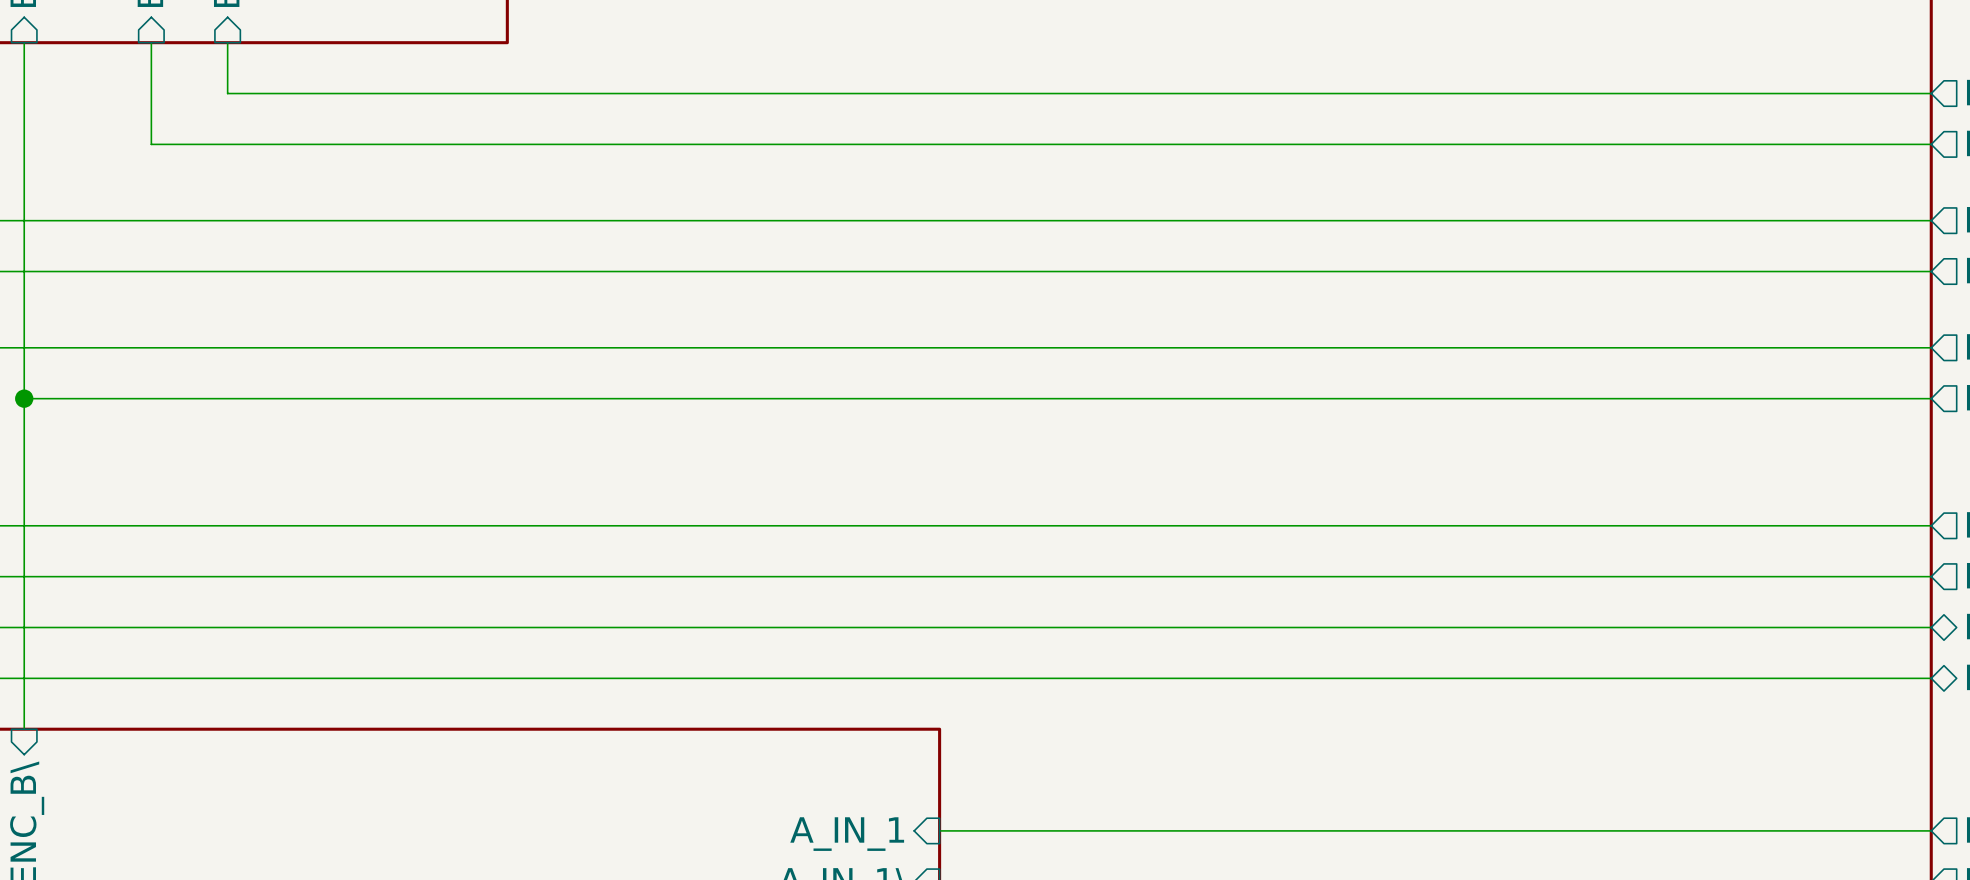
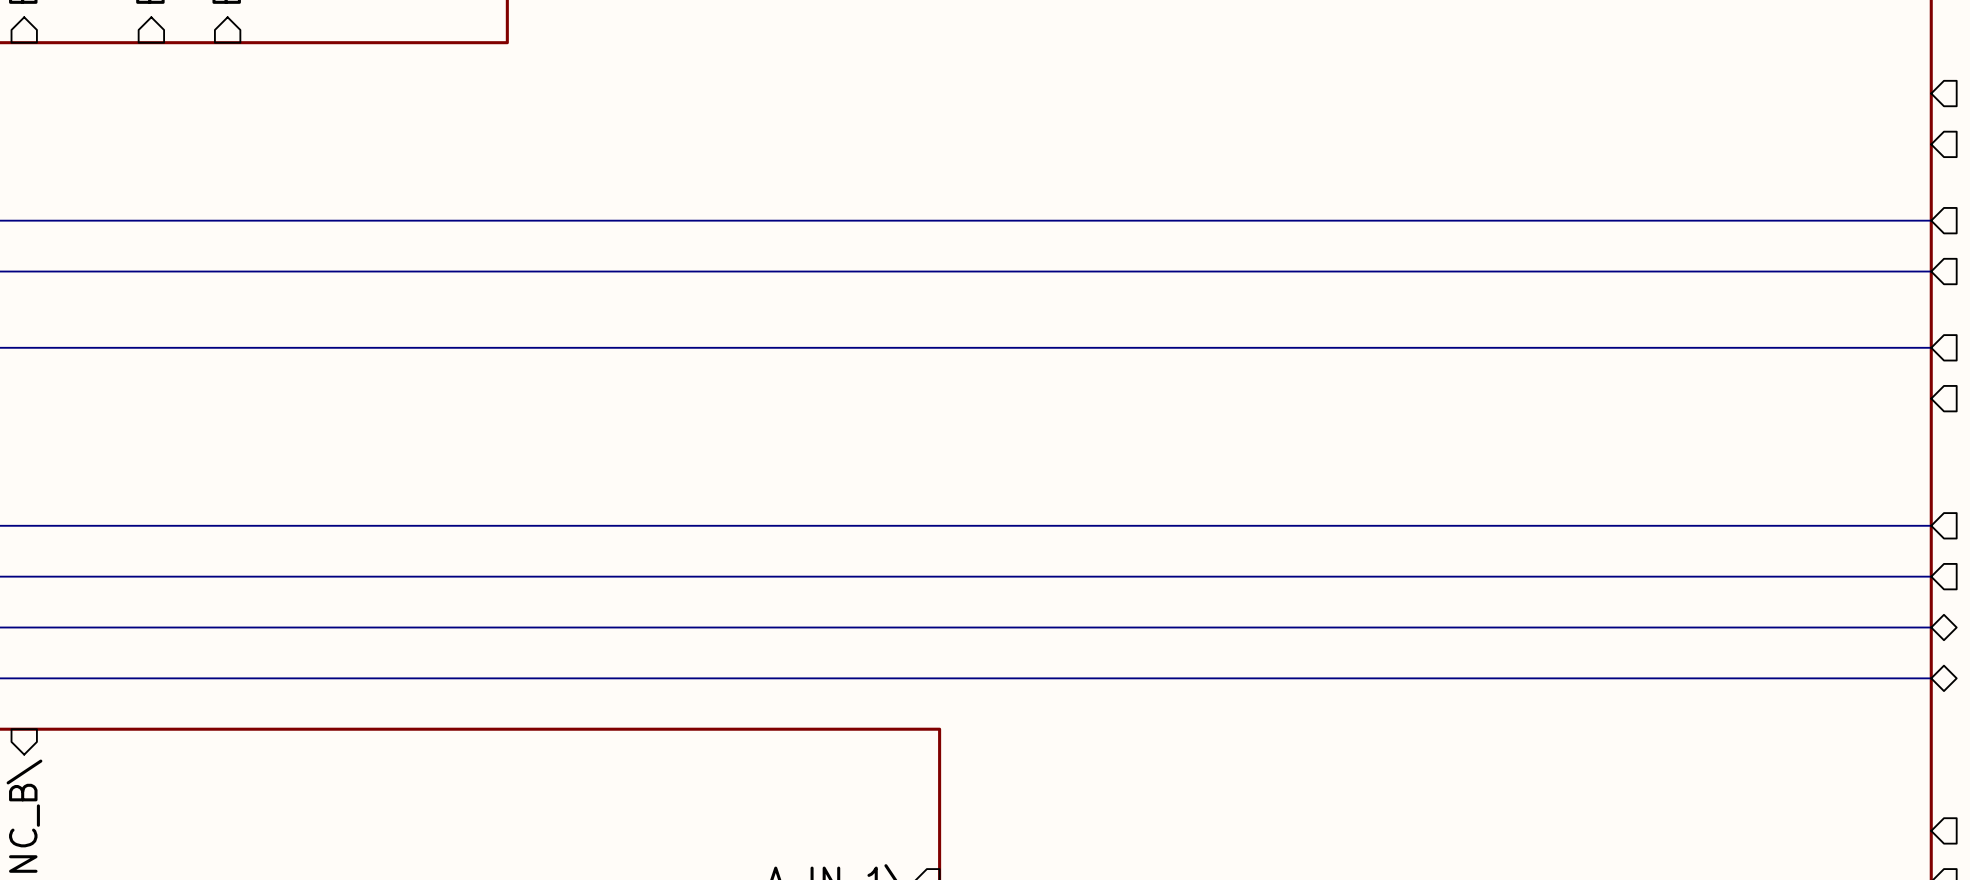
wire: (24, 42) (24, 729) -> none
wire: (151, 42) (151, 144) (1931, 144) -> none
wire: (227, 42) (227, 93) (1931, 93) -> none
wire: (24, 398) (1931, 398) -> none
junction: (24, 398) -> none
wire: (939, 830) (1931, 830) -> none
sheet pin: A_IN_1 (847, 834) -> none

